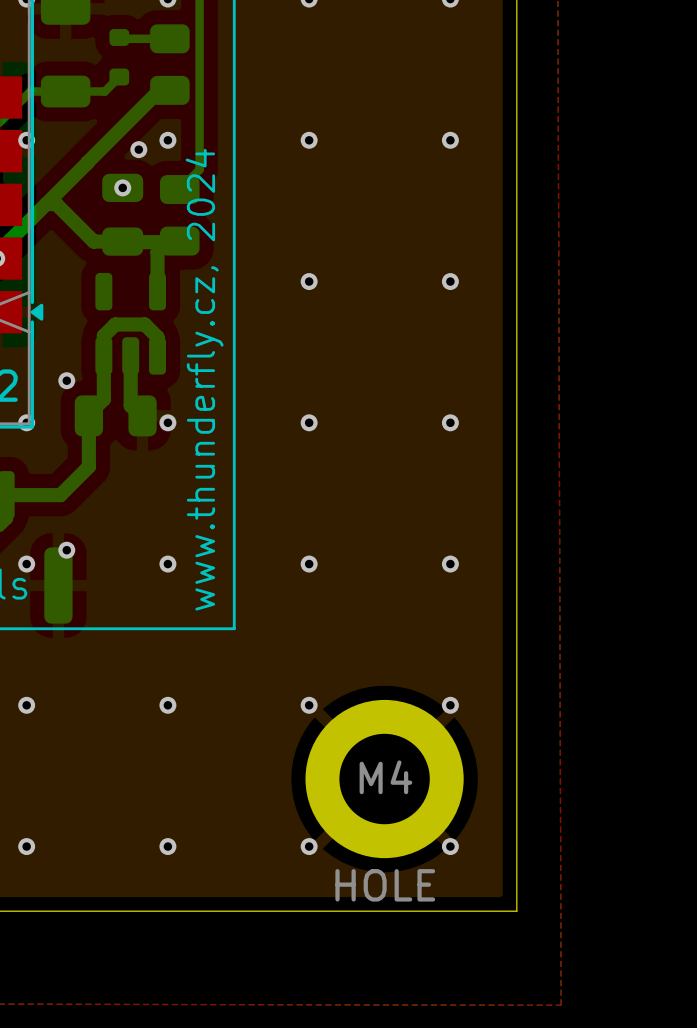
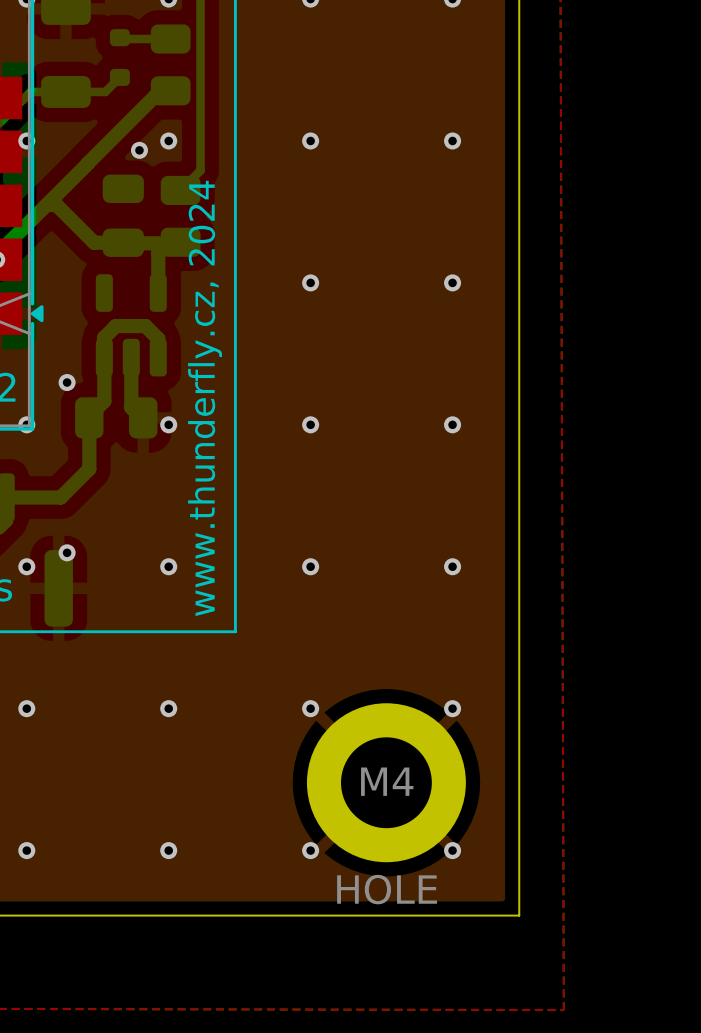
via: (122, 187) -> none

